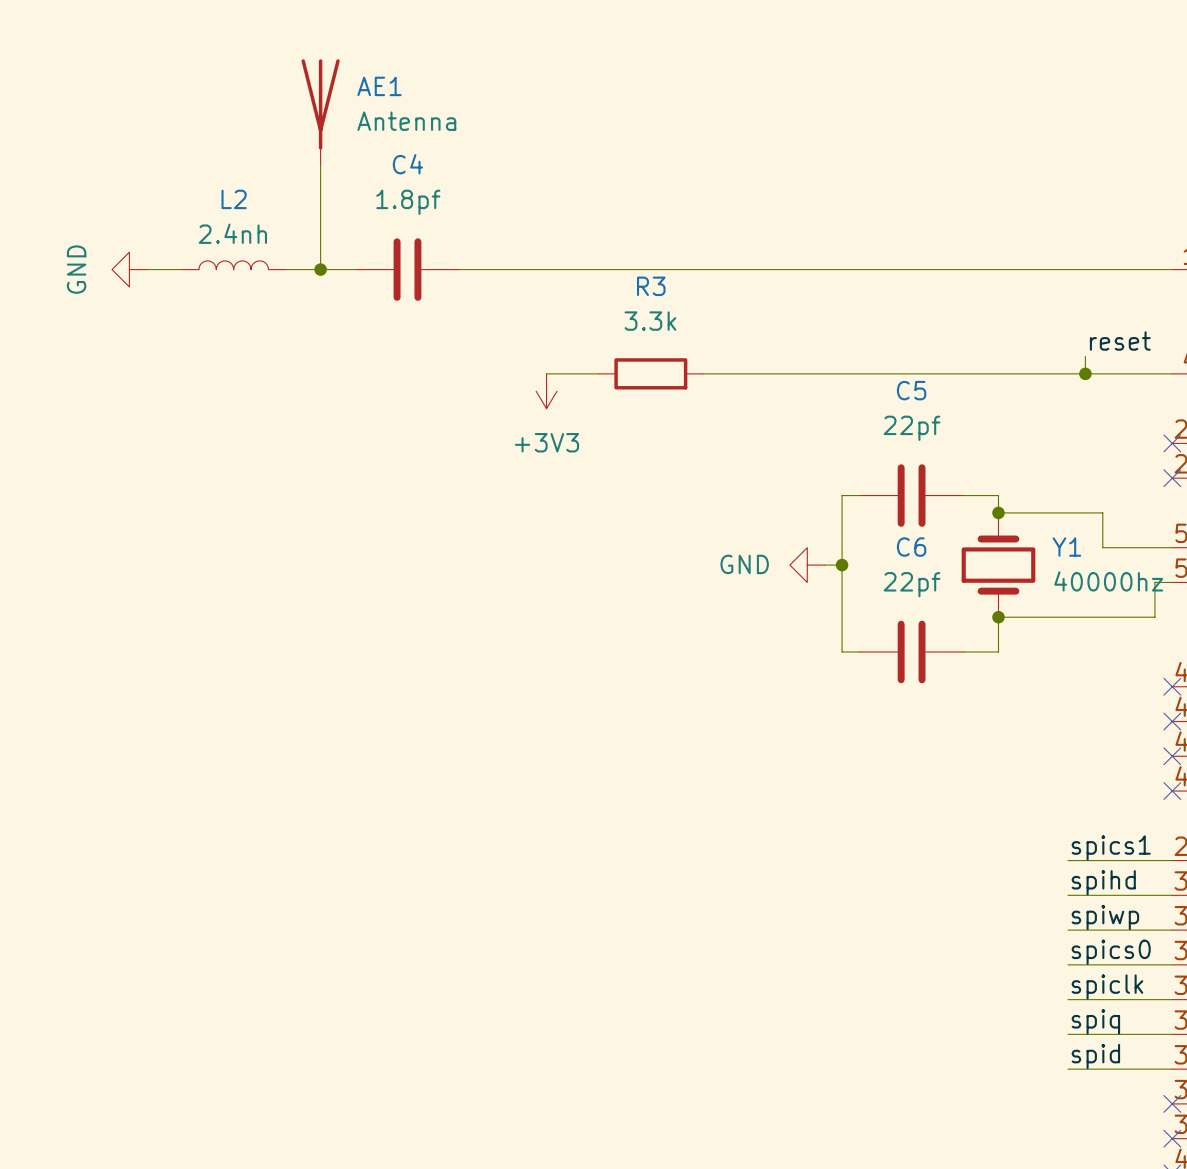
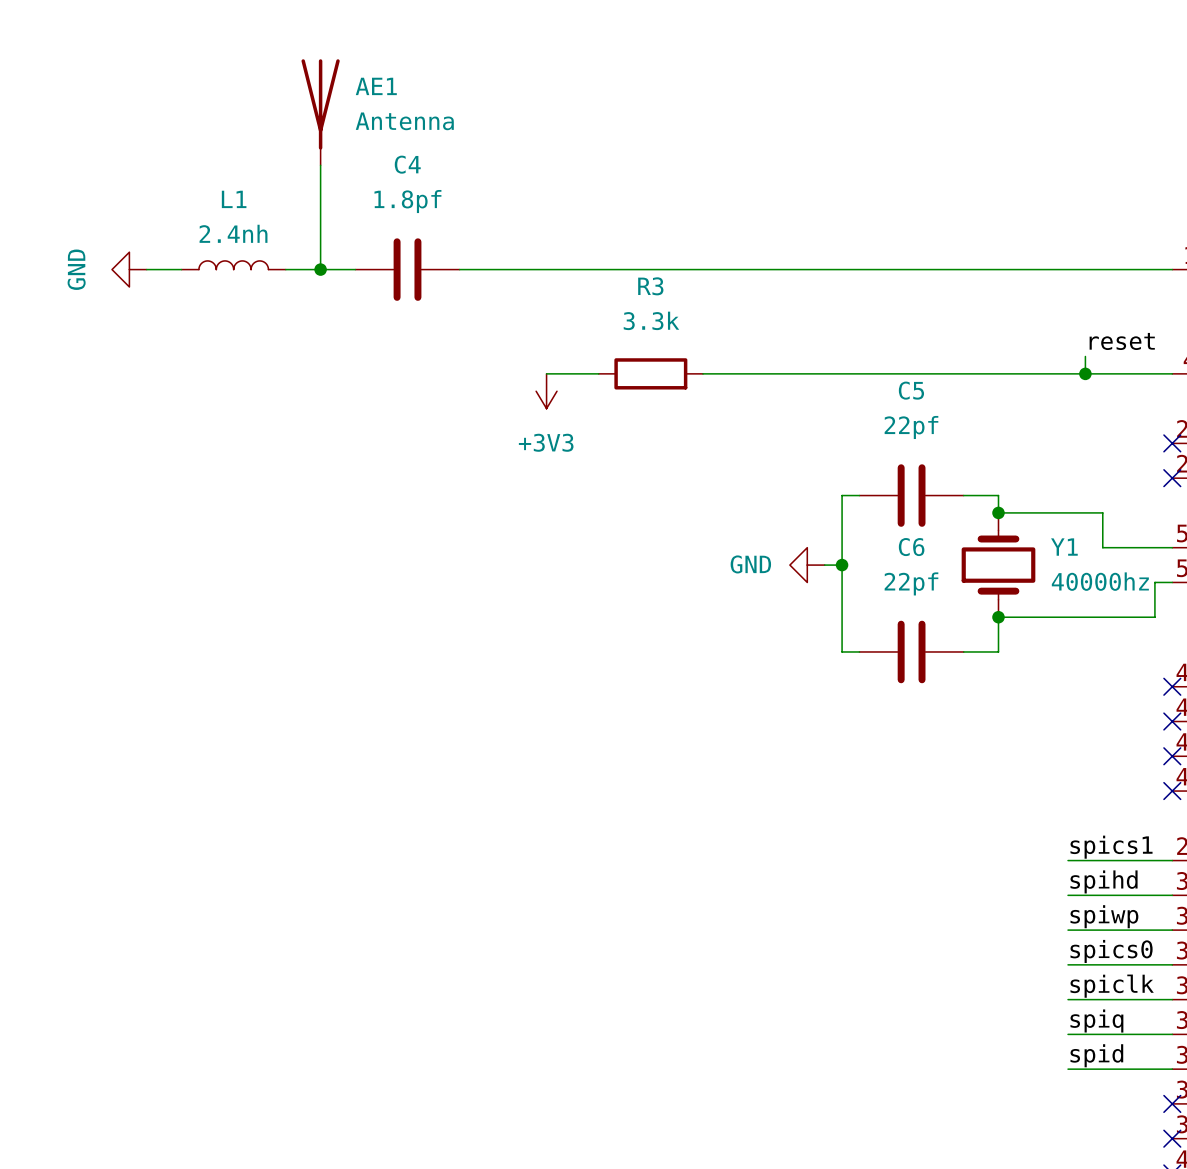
L2 name: L2 (234, 199) -> L1 (234, 199)

